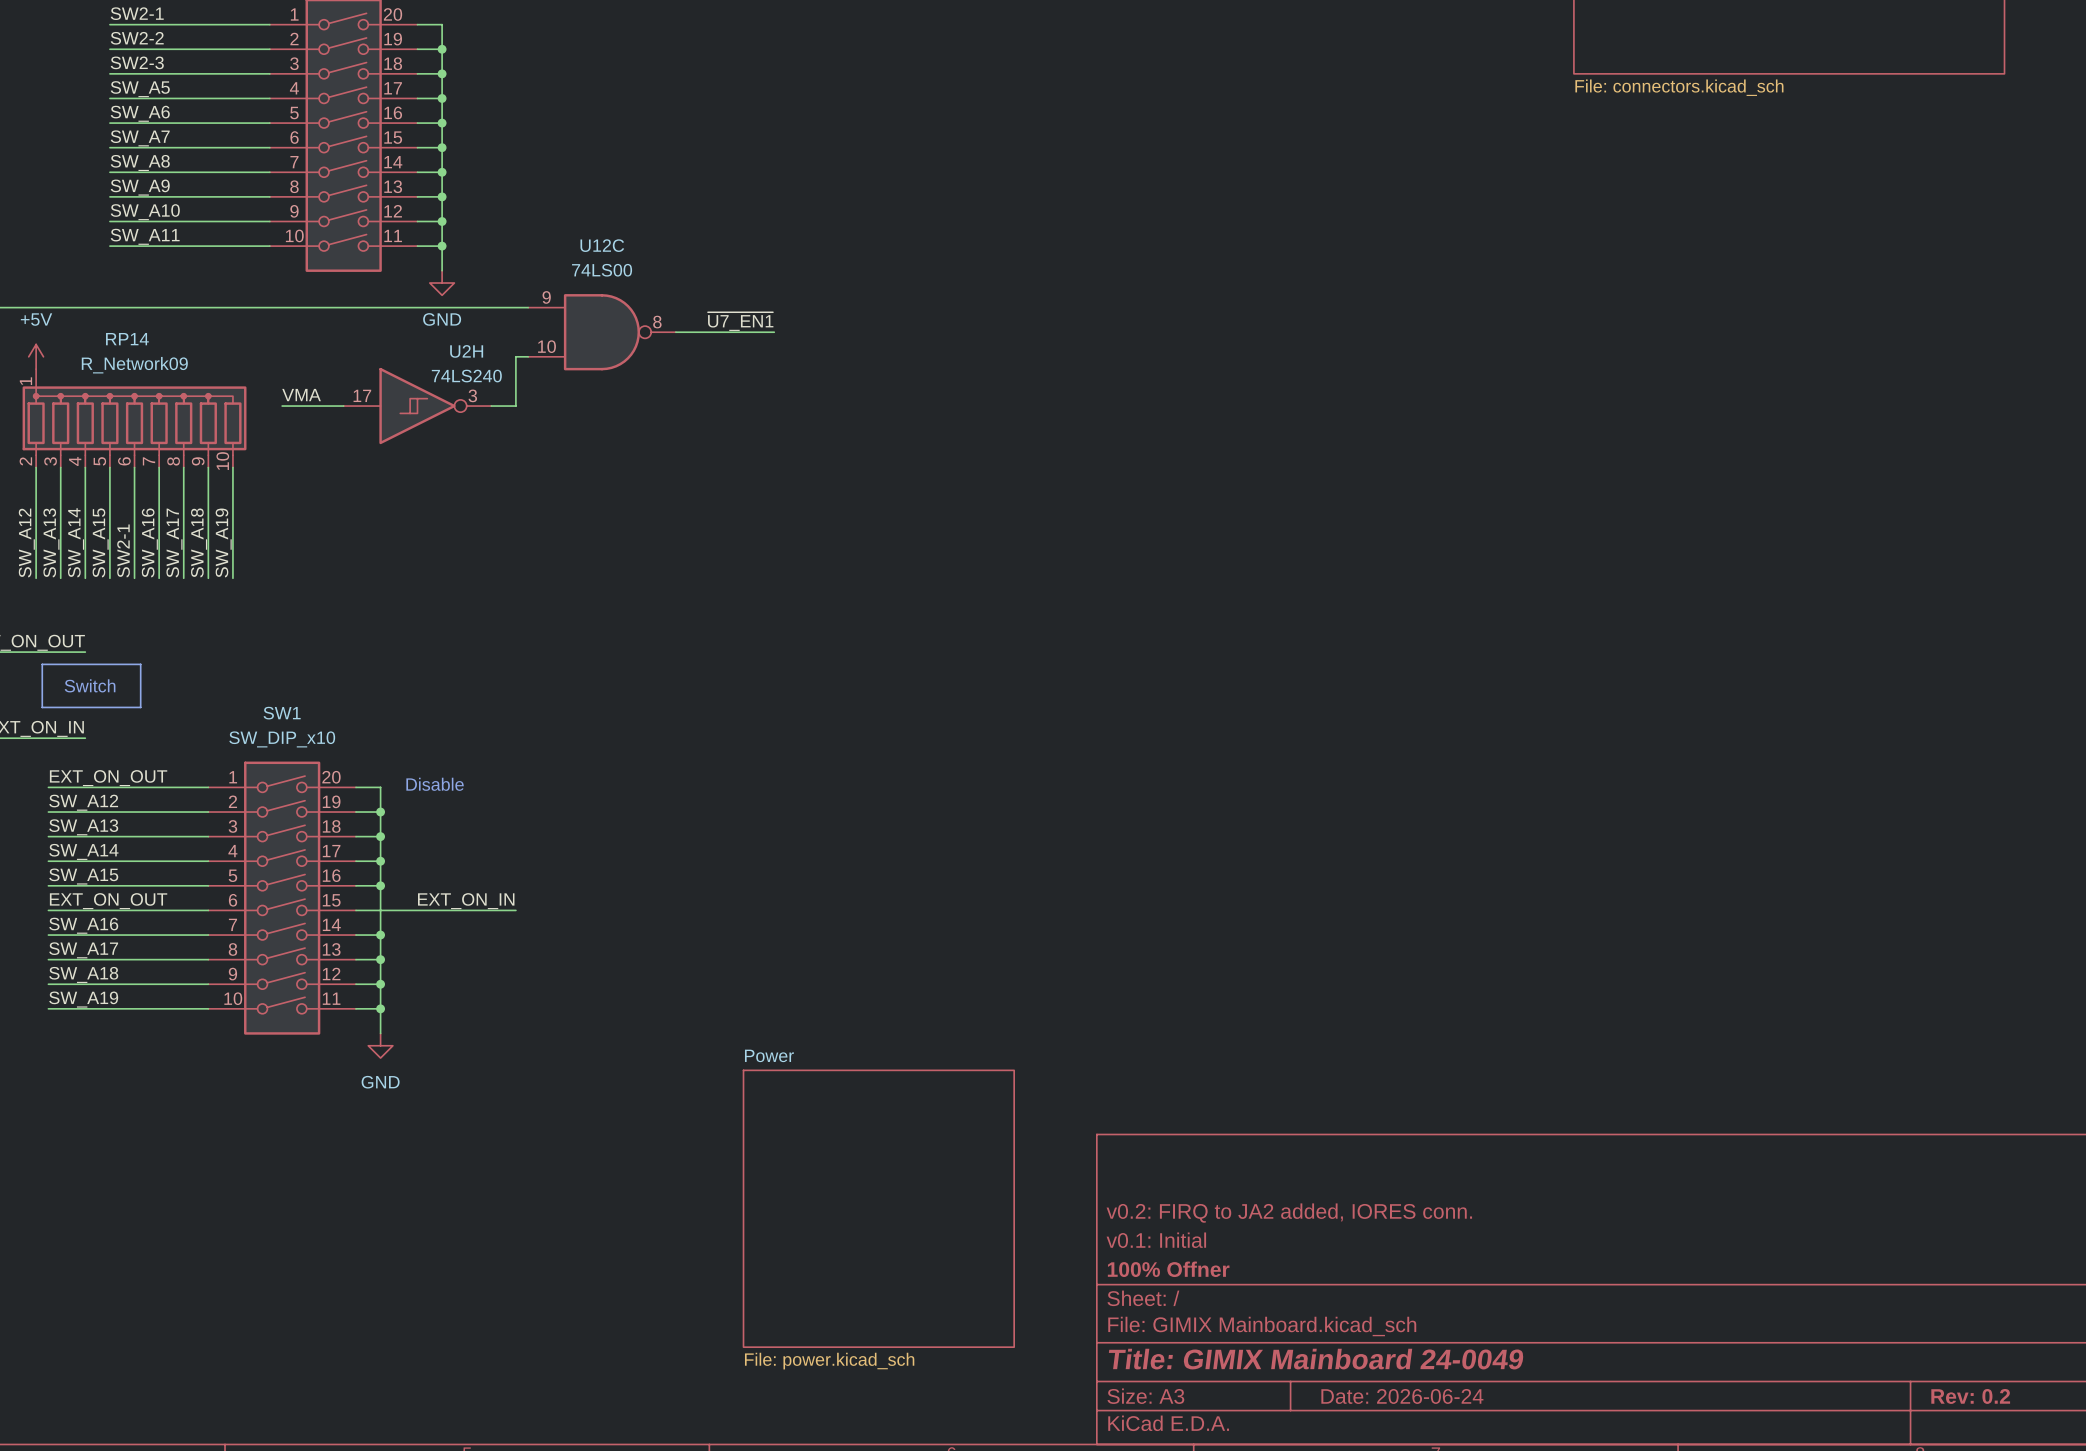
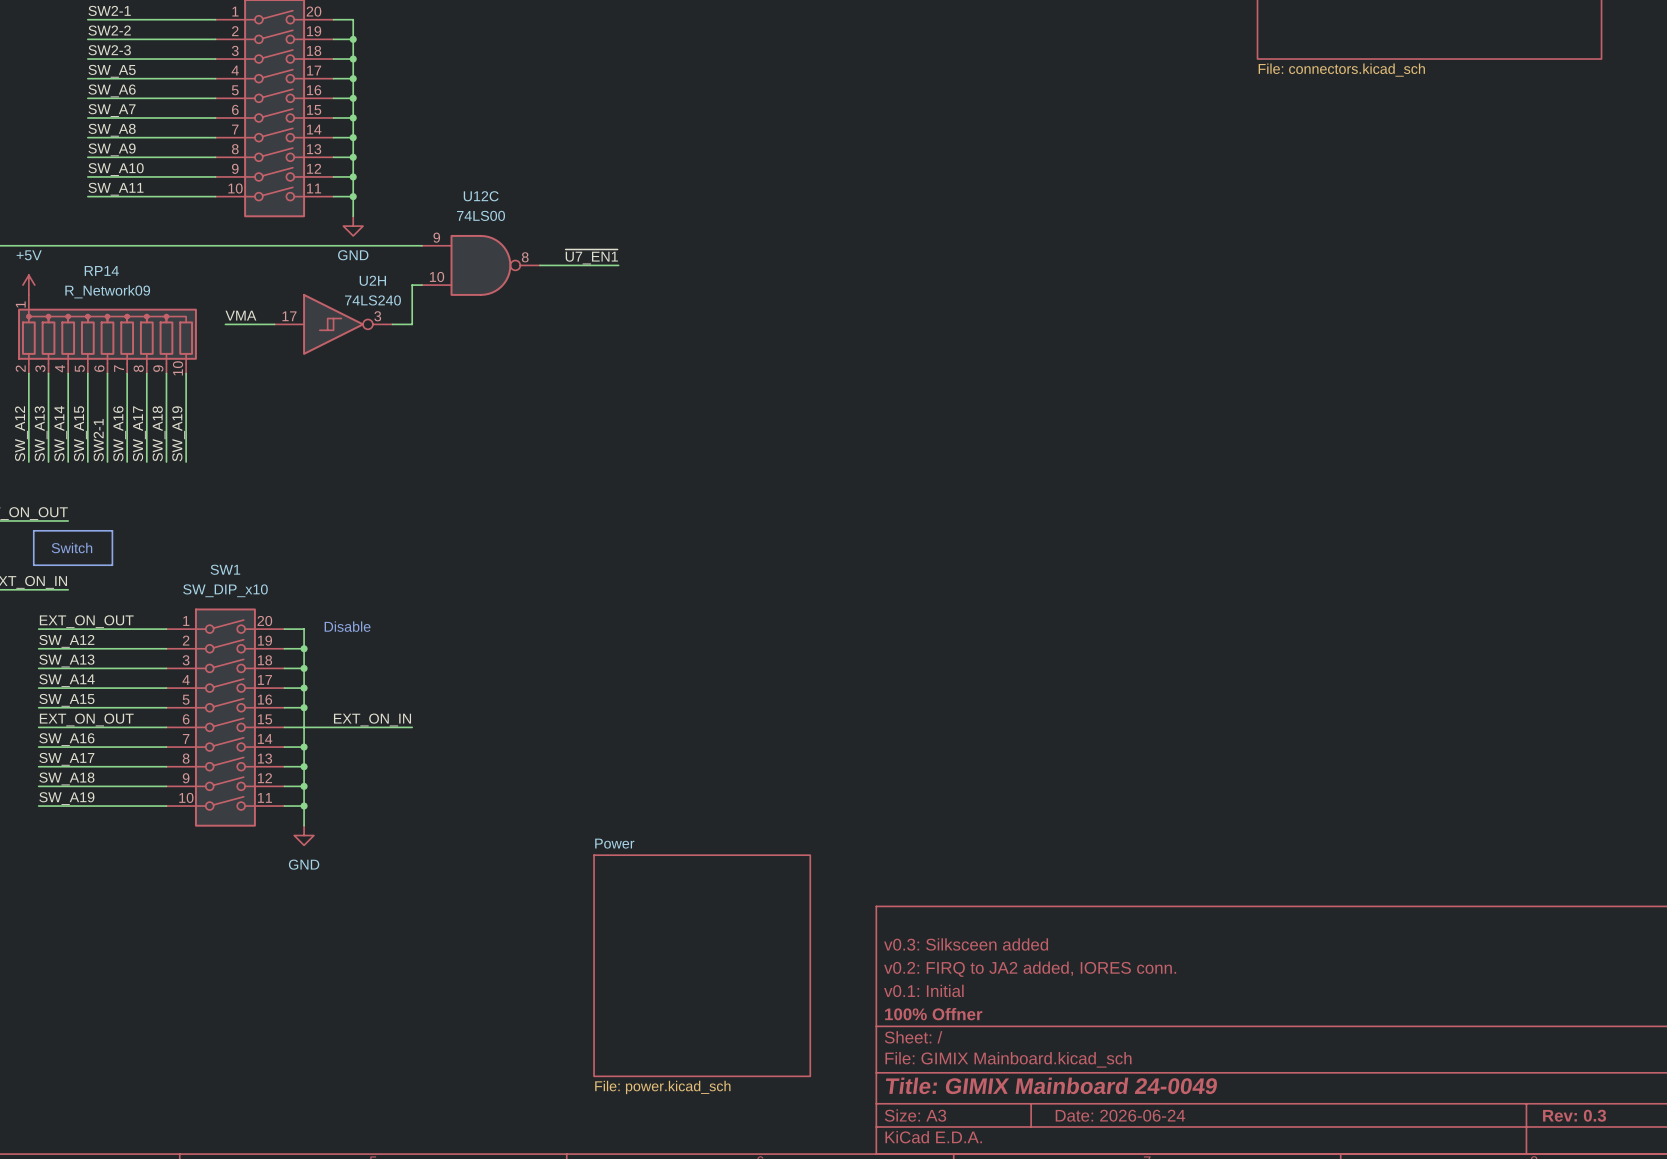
title block: none -> v0.3: Silksceen added (966, 944)
title block: Rev: 0.2 (1970, 1396) -> Rev: 0.3 (1574, 1115)

